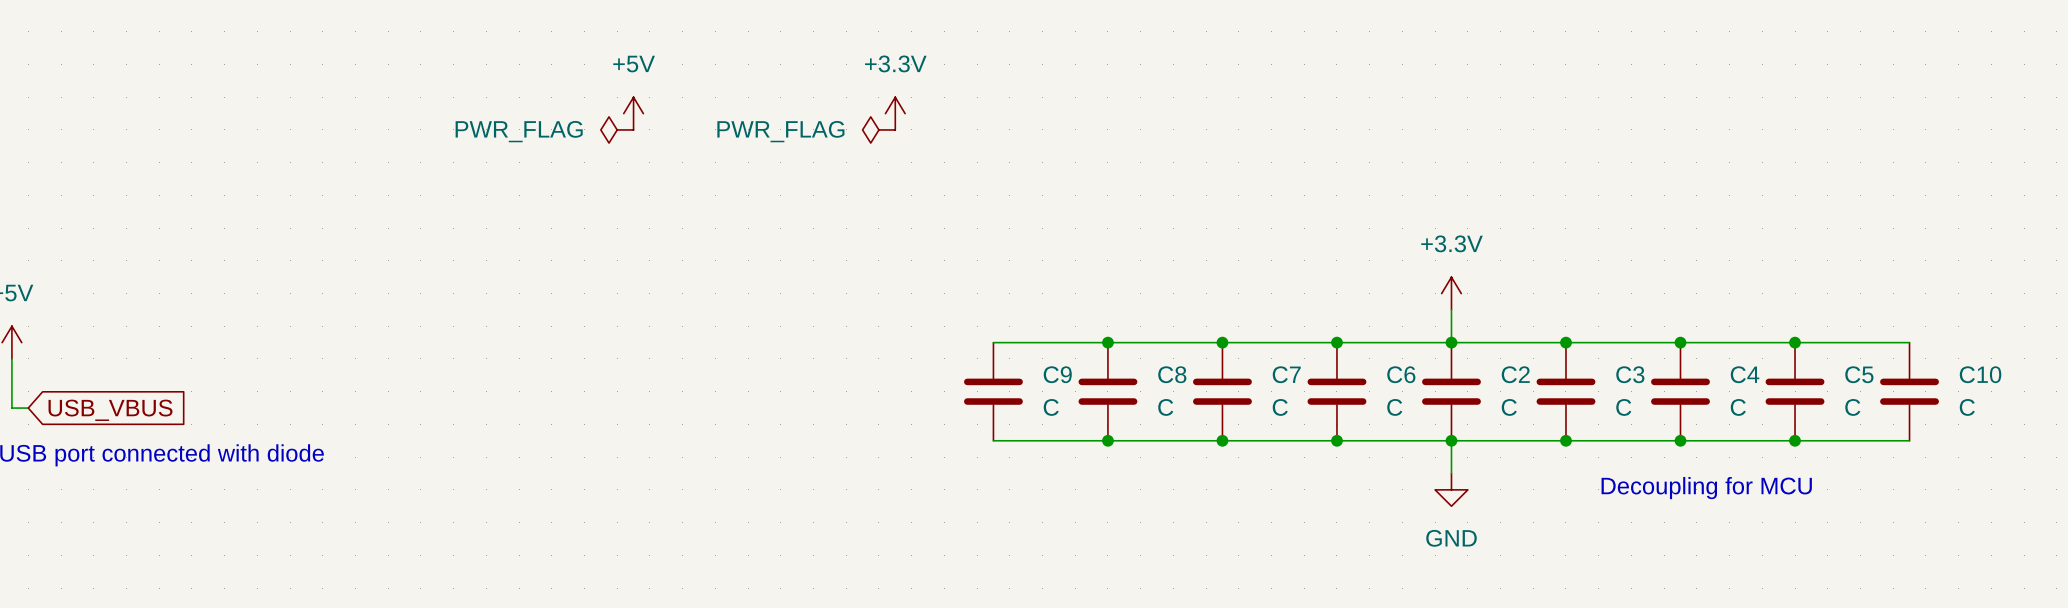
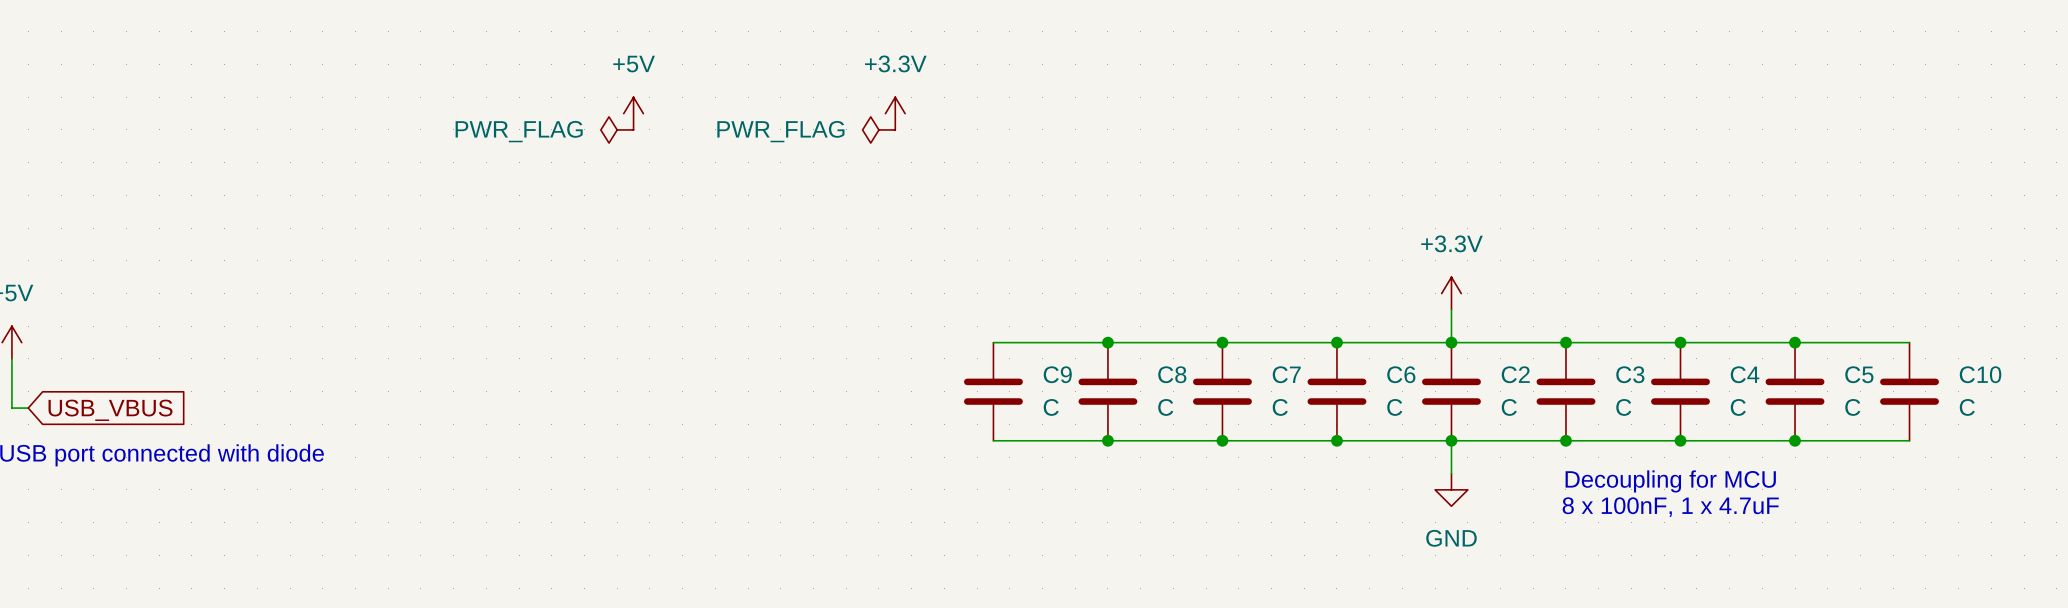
text position: Decoupling for MCU (1706, 488) -> Decoupling for MCU (1670, 481)
text: none -> 8 x 100nF, 1 x 4.7uF (1670, 507)

